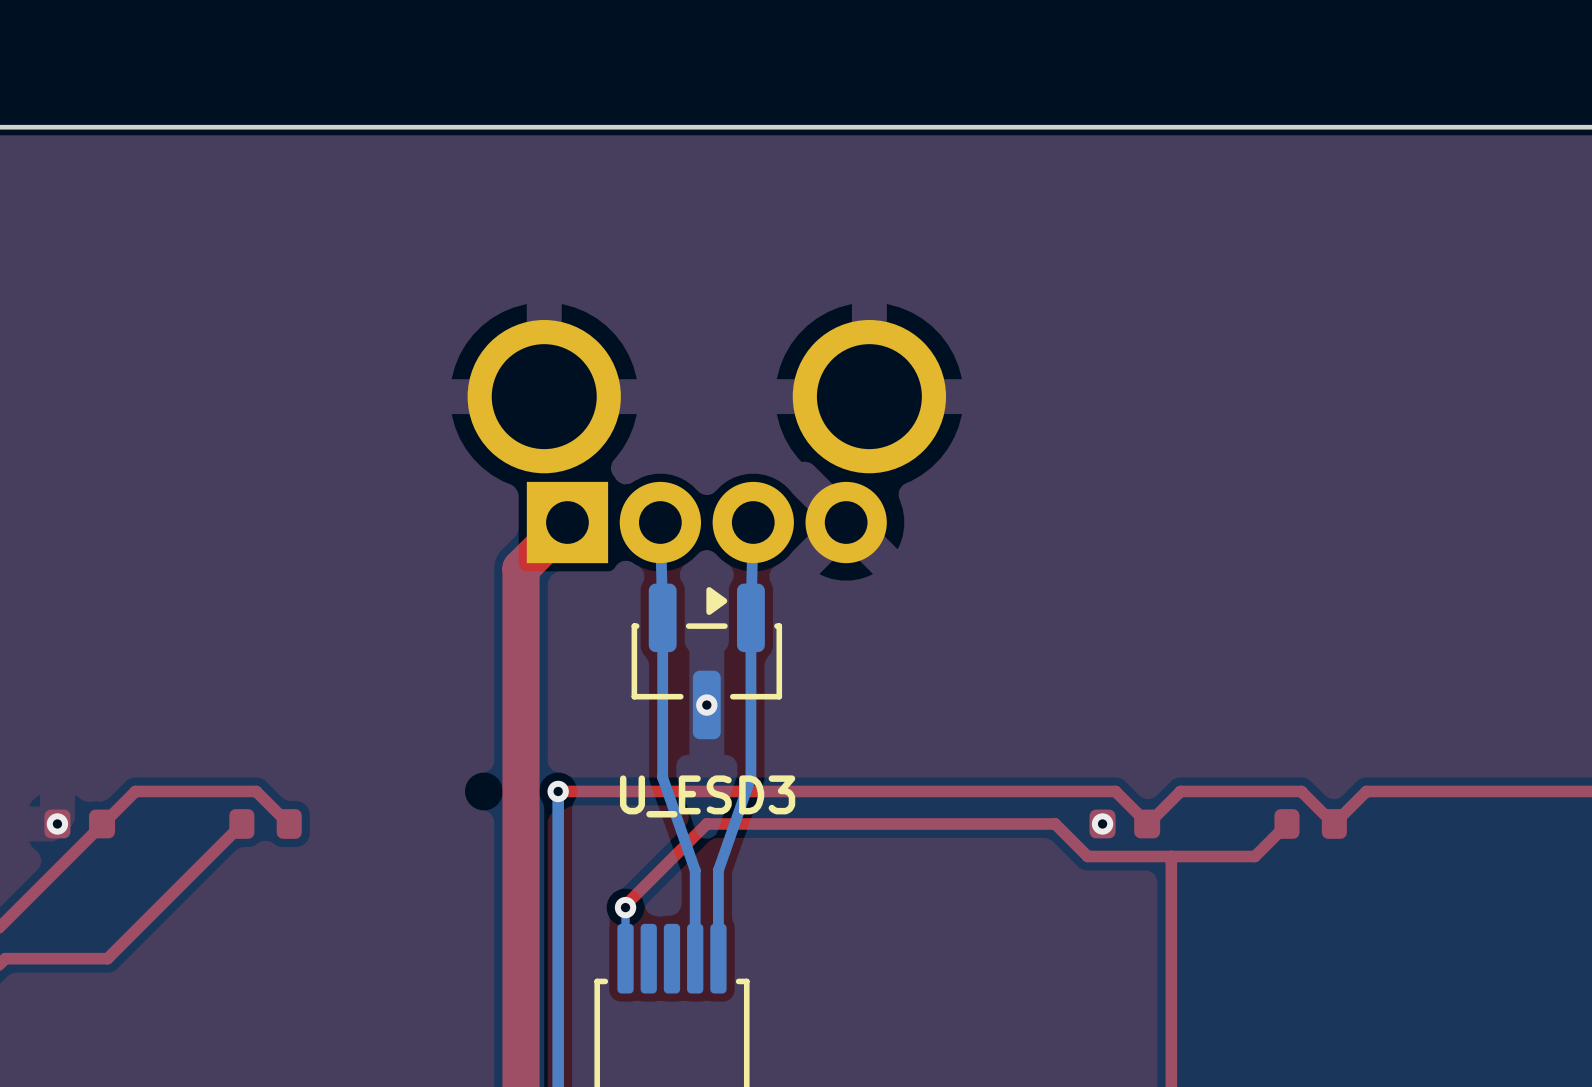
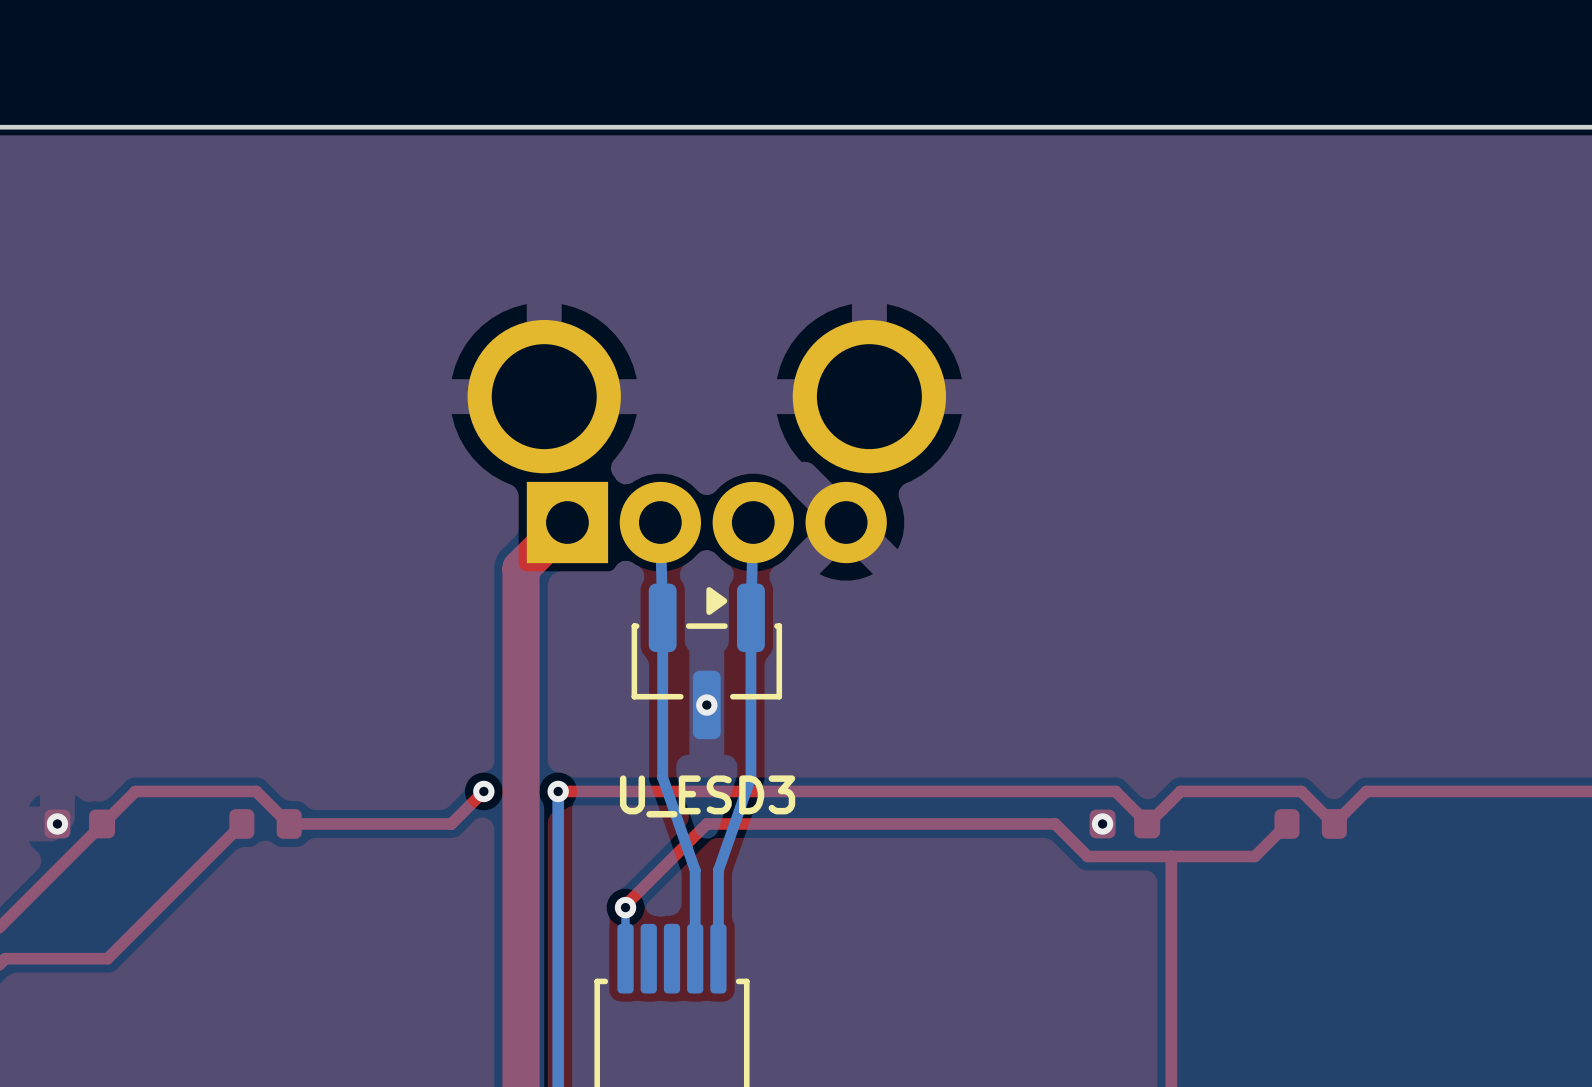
top track: none -> (483, 791) (451, 823) (288, 823)
via: none -> (483, 791)

